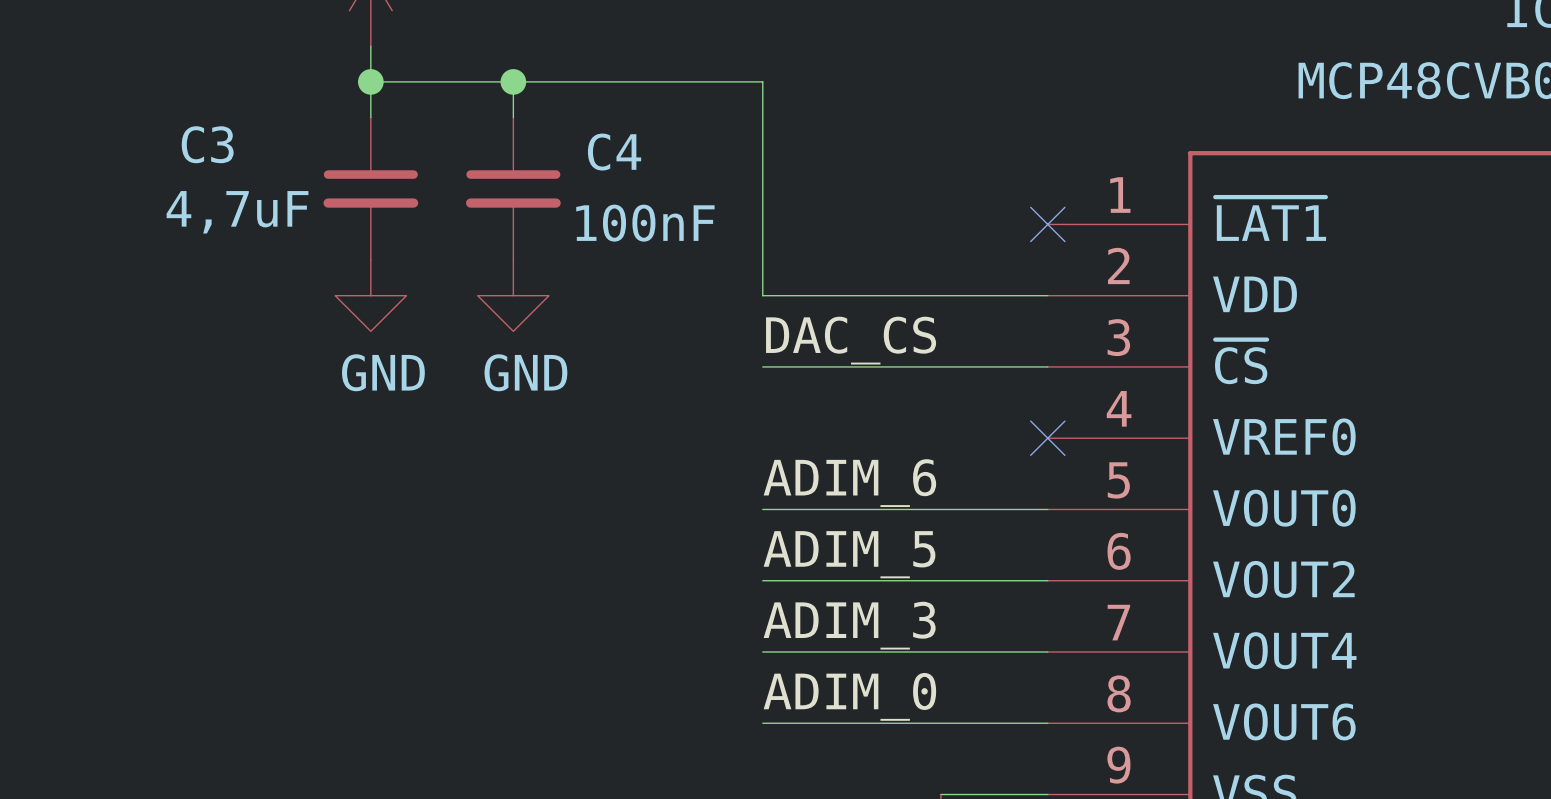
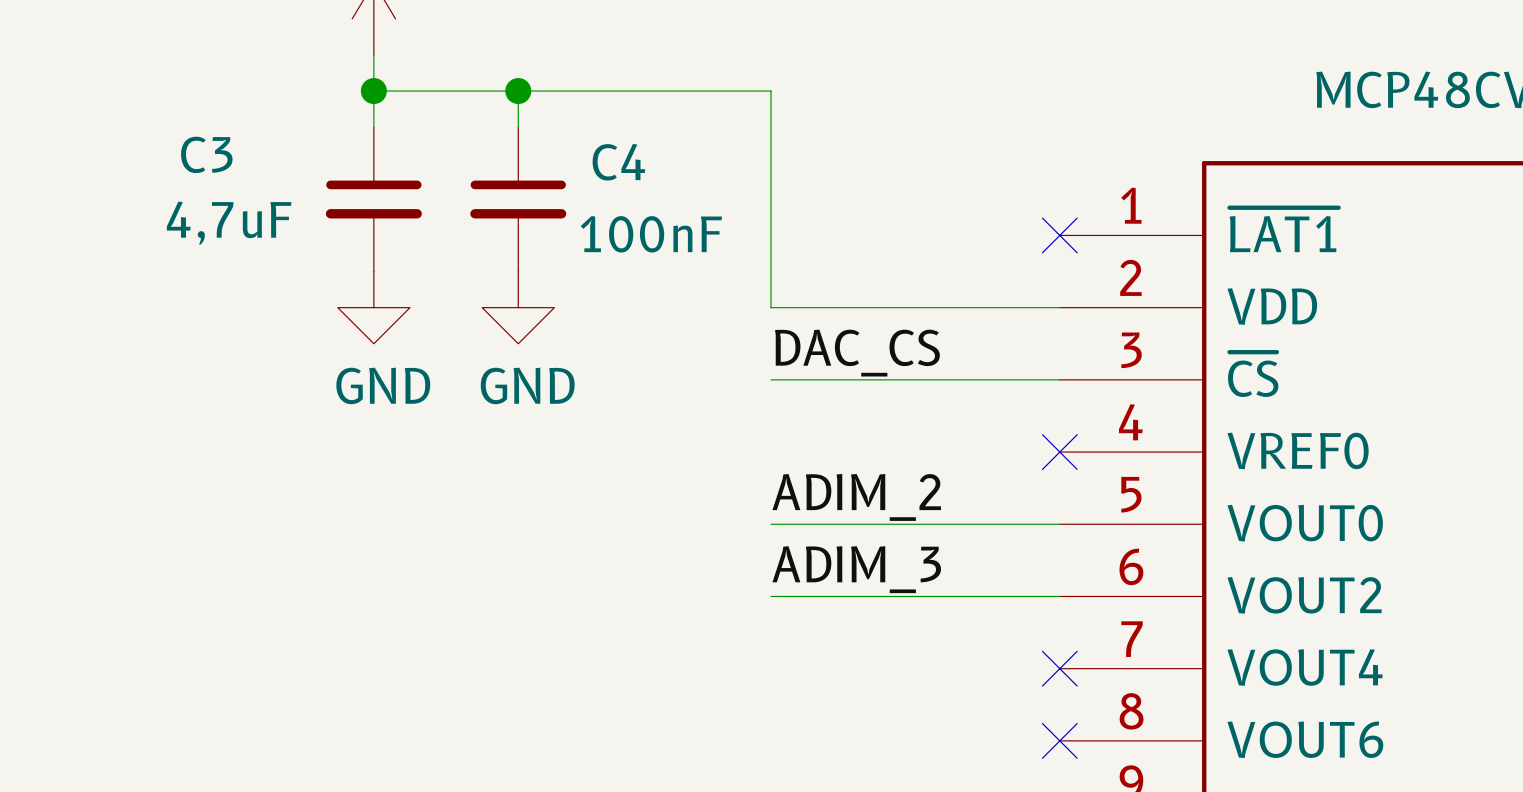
label: ADIM_6 (849, 483) -> ADIM_2 (856, 497)
label: ADIM_5 (849, 554) -> ADIM_3 (856, 569)
label: ADIM_3 (849, 625) -> none
wire: (762, 651) (1047, 651) -> none
no-connect mark: none -> (1059, 668)
label: ADIM_0 (849, 696) -> none
wire: (762, 723) (1047, 723) -> none
no-connect mark: none -> (1059, 740)

